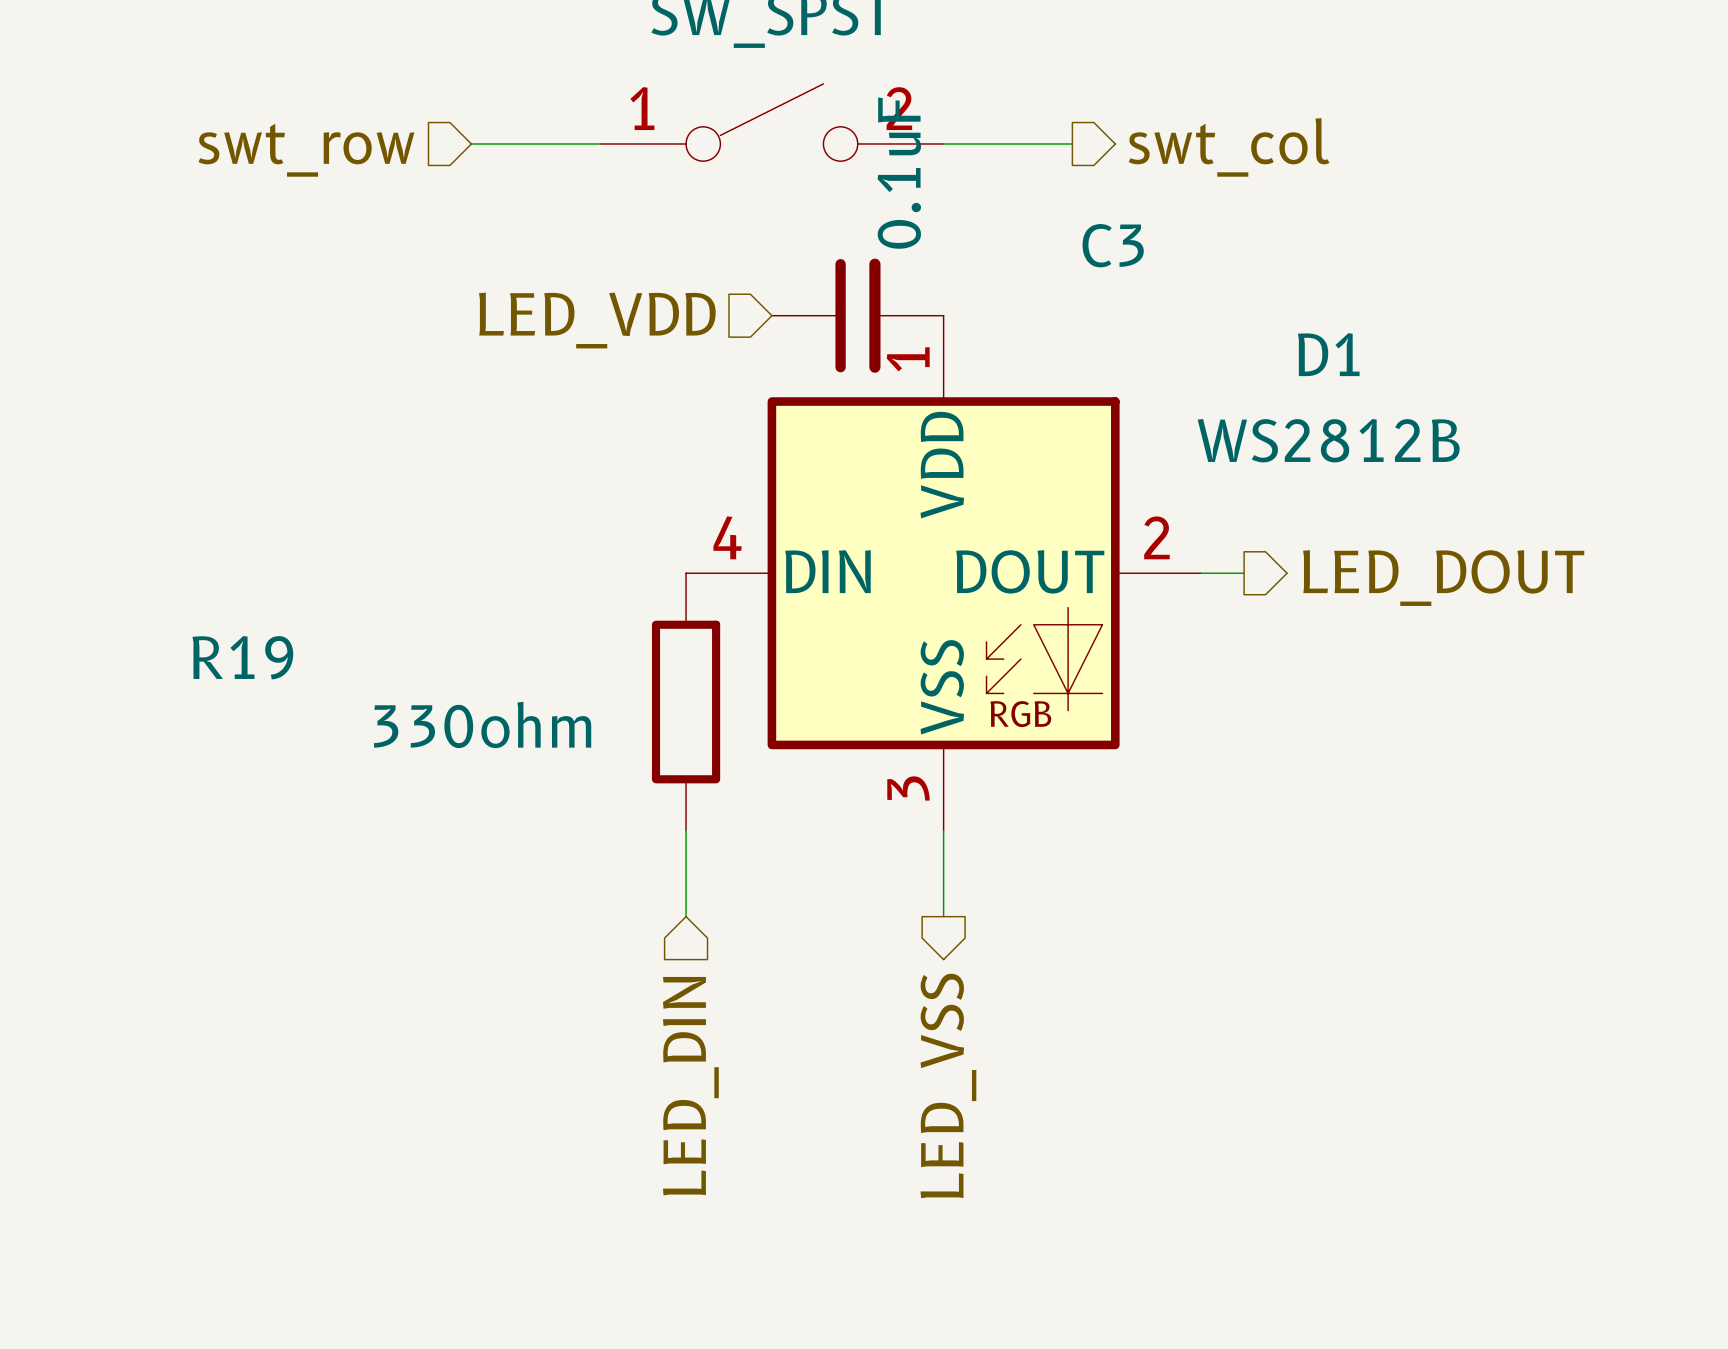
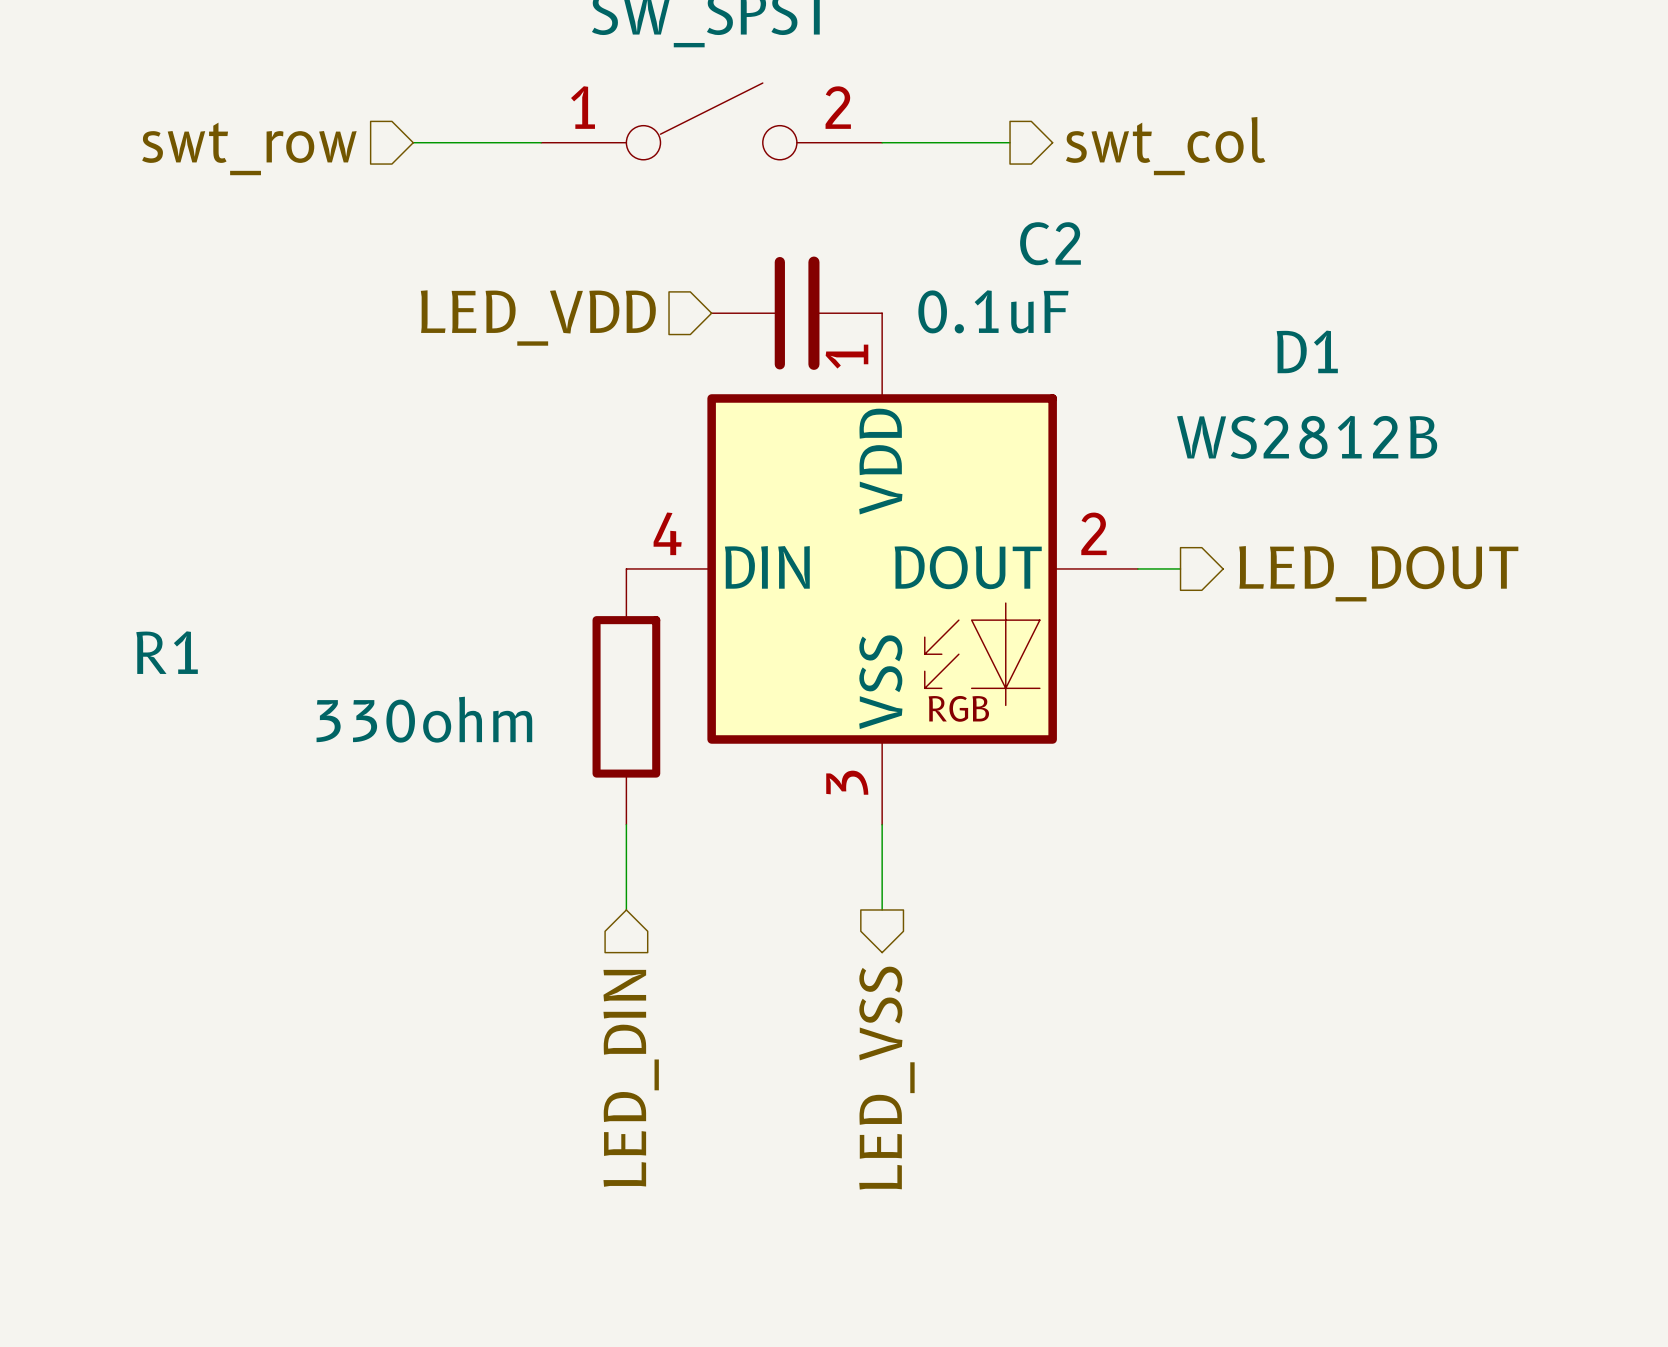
C3 text rotation: 0° (899, 173) -> 90° clockwise (993, 311)
C3 text position: 0.1uF (899, 173) -> 0.1uF (993, 311)
C3 name: C3 (1113, 245) -> C2 (1050, 243)
D1 name position: D1 (1328, 354) -> D1 (1307, 351)
D1 value position: WS2812B (1328, 440) -> WS2812B (1307, 437)
R19 name: R19 (242, 657) -> R1 (167, 652)

